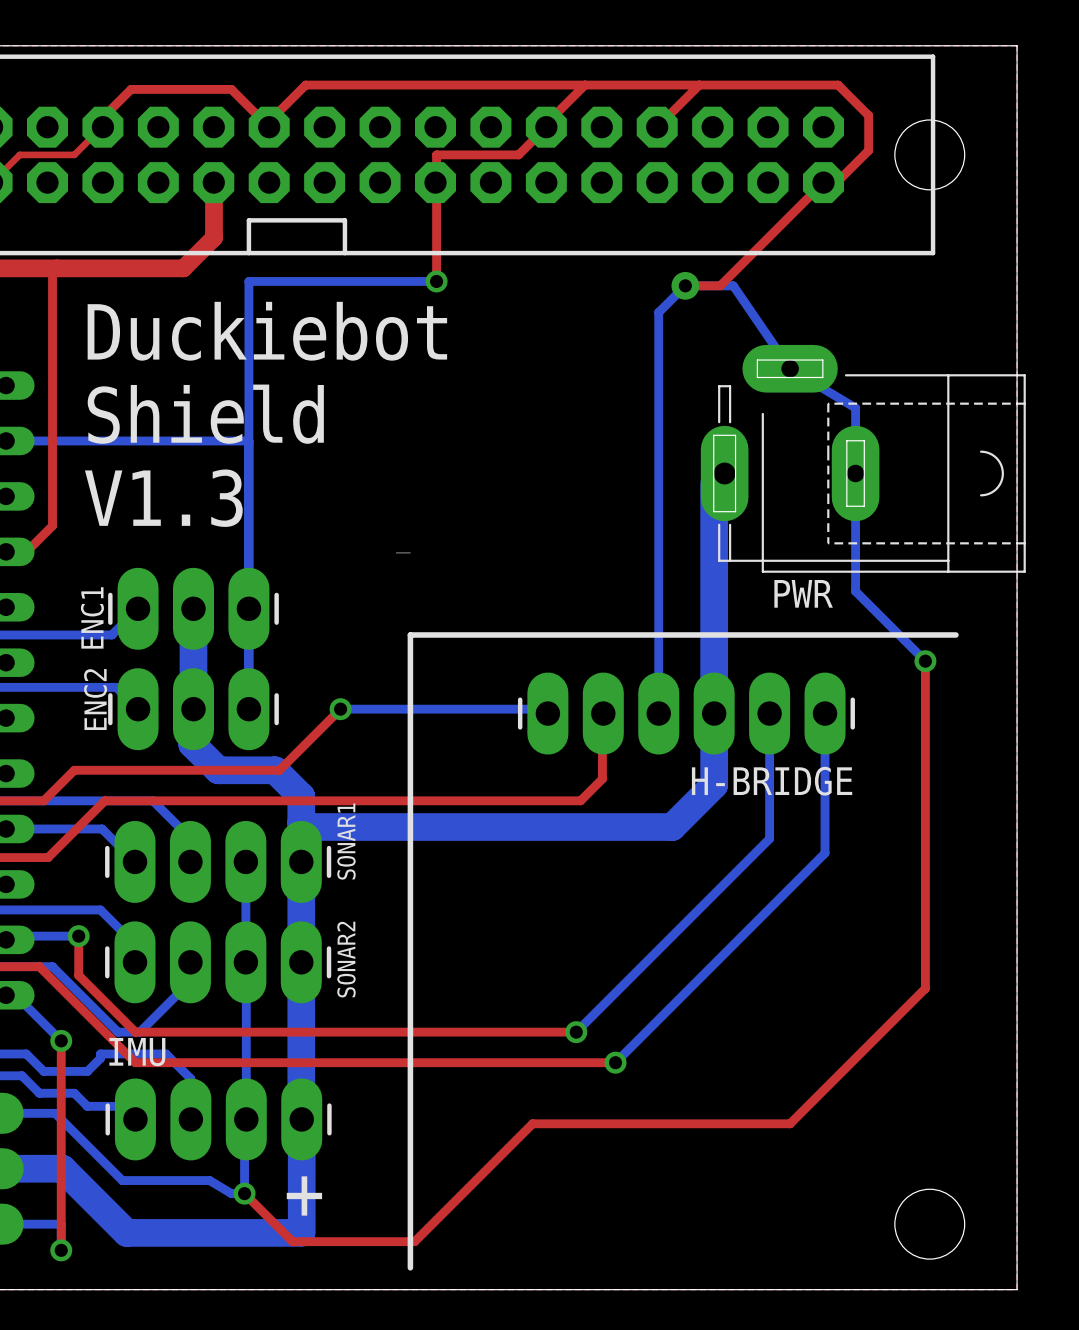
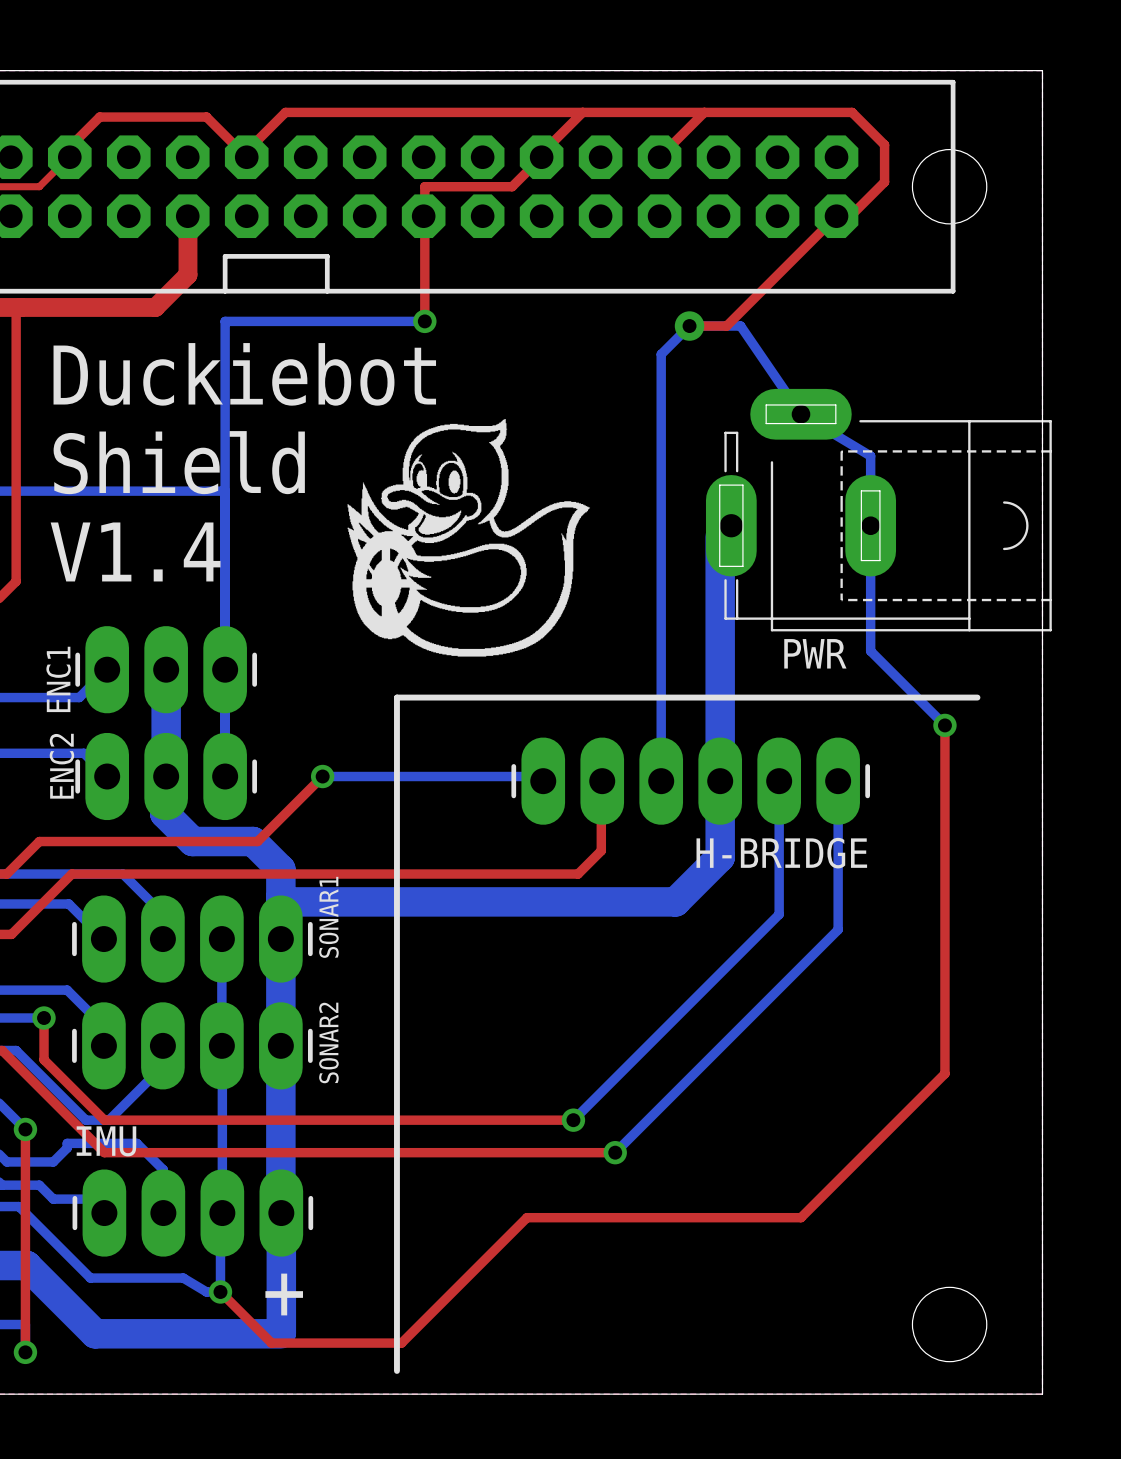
drawing: none -> [347, 419, 591, 657]
text: V1.3 (163, 498) -> V1.4 (135, 551)

